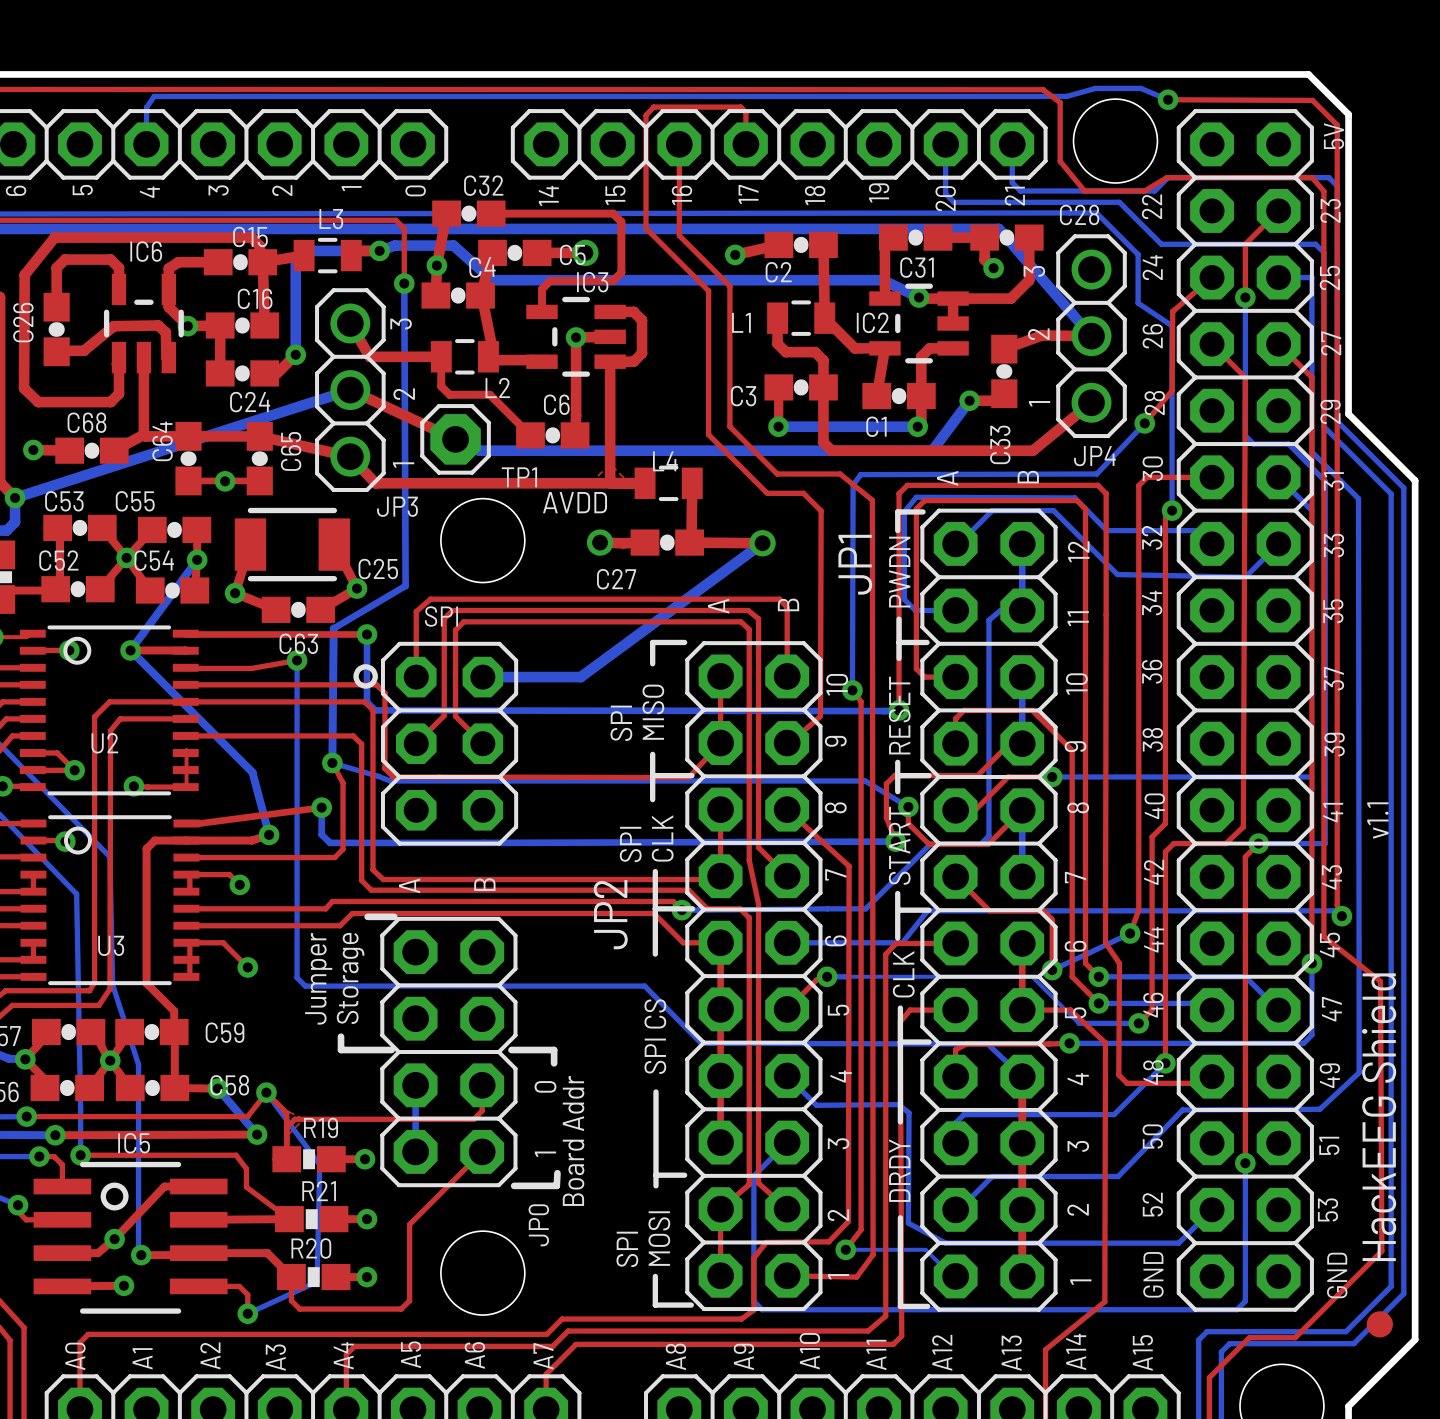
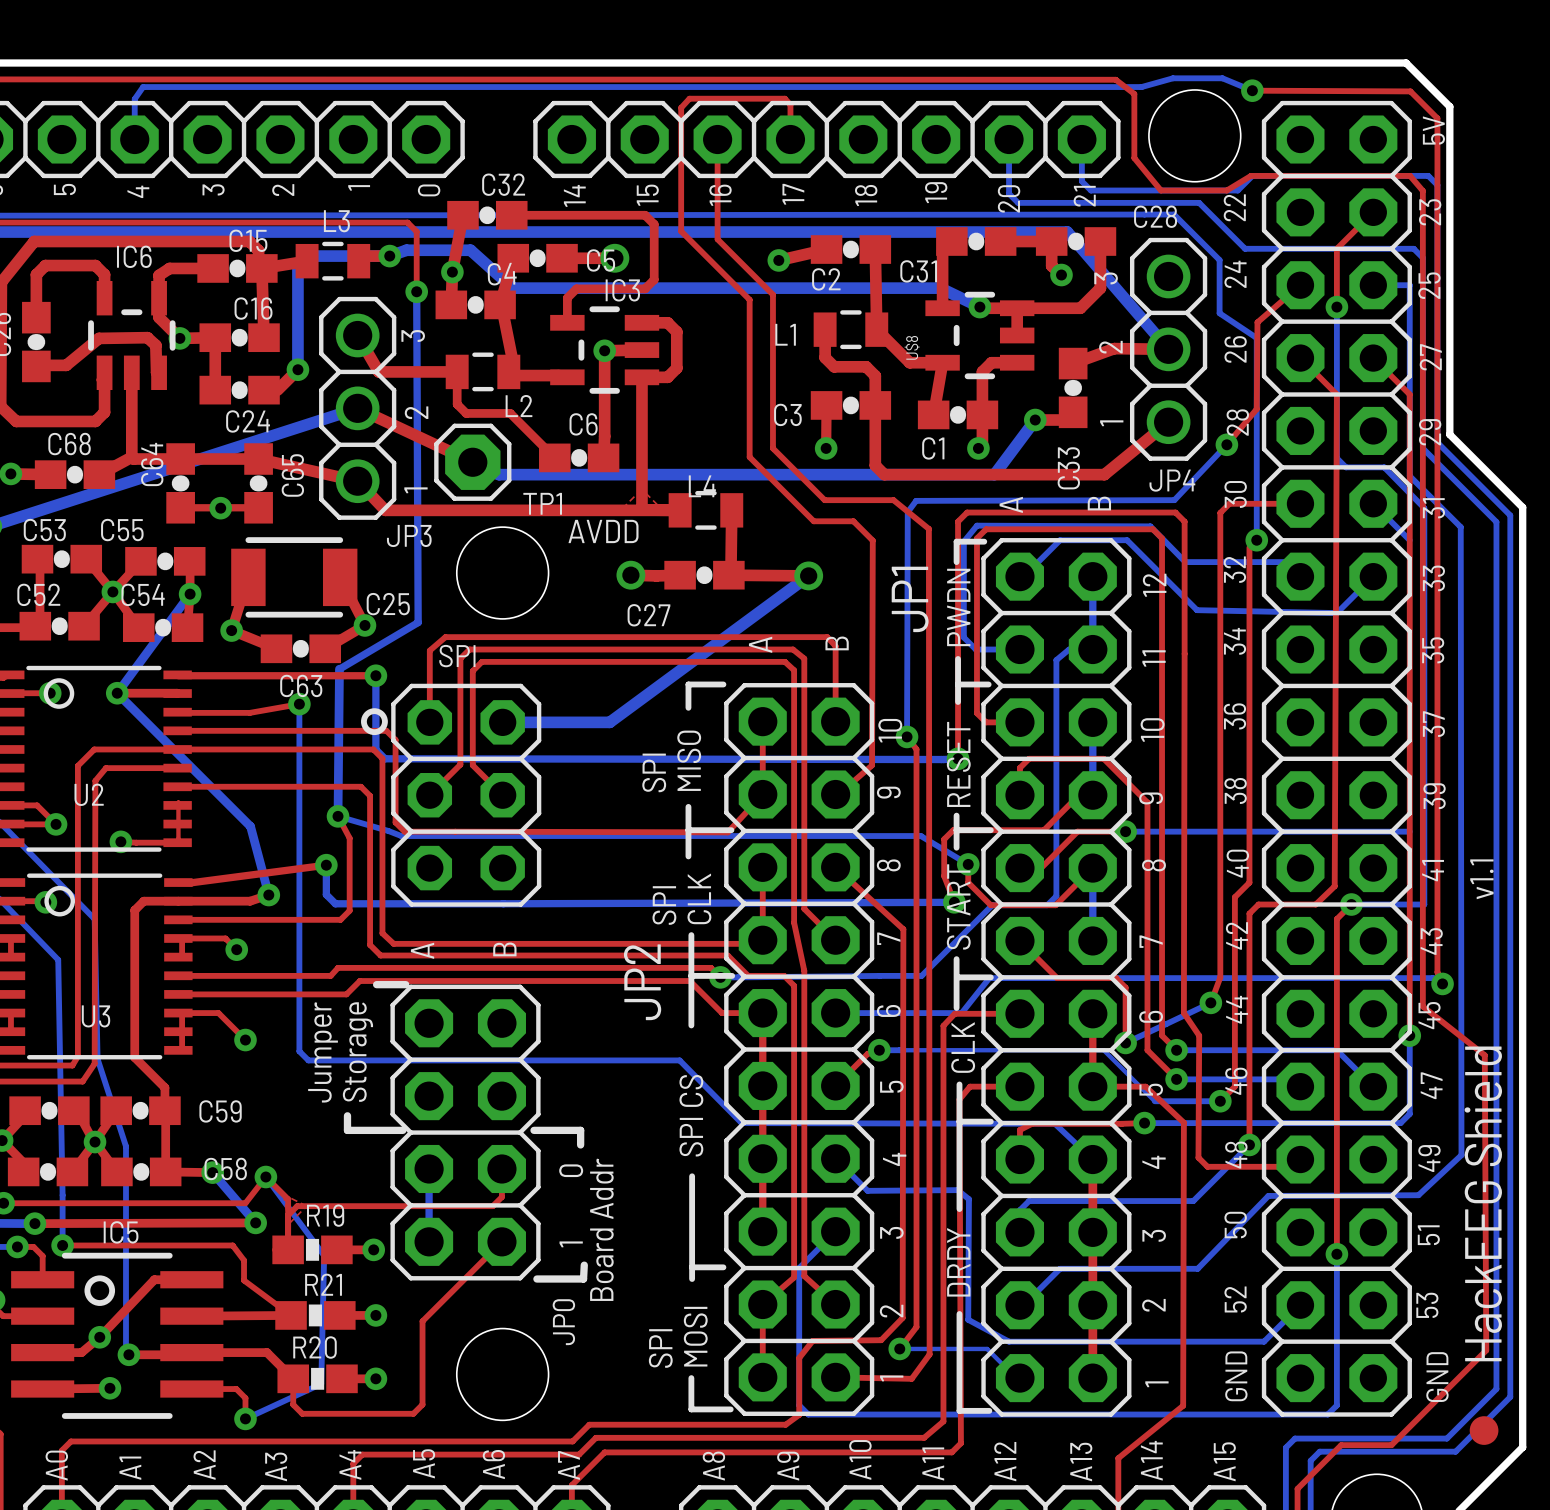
C31 name position: C31 (917, 267) -> C31 (918, 271)
IC2 name: IC2 (872, 322) -> U$8 (912, 347)
bottom track: (778, 426) (917, 426) -> none

